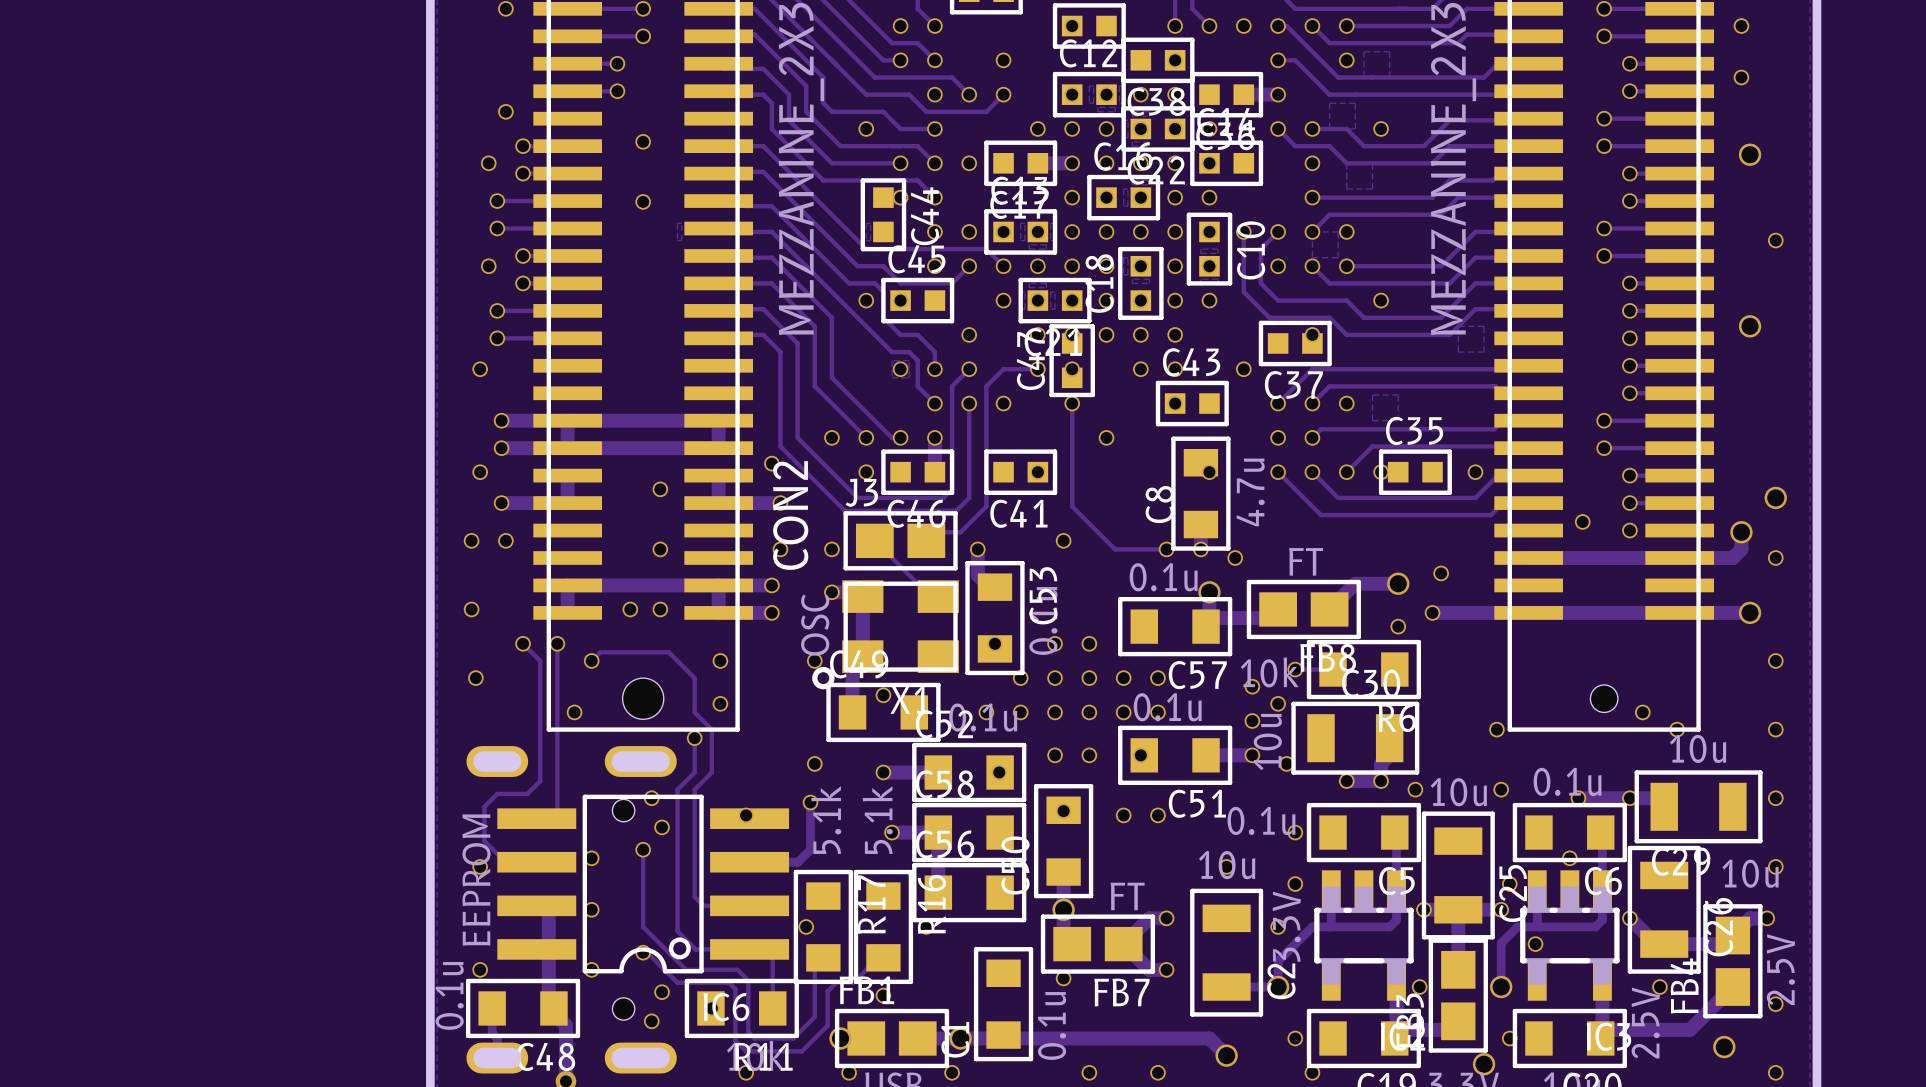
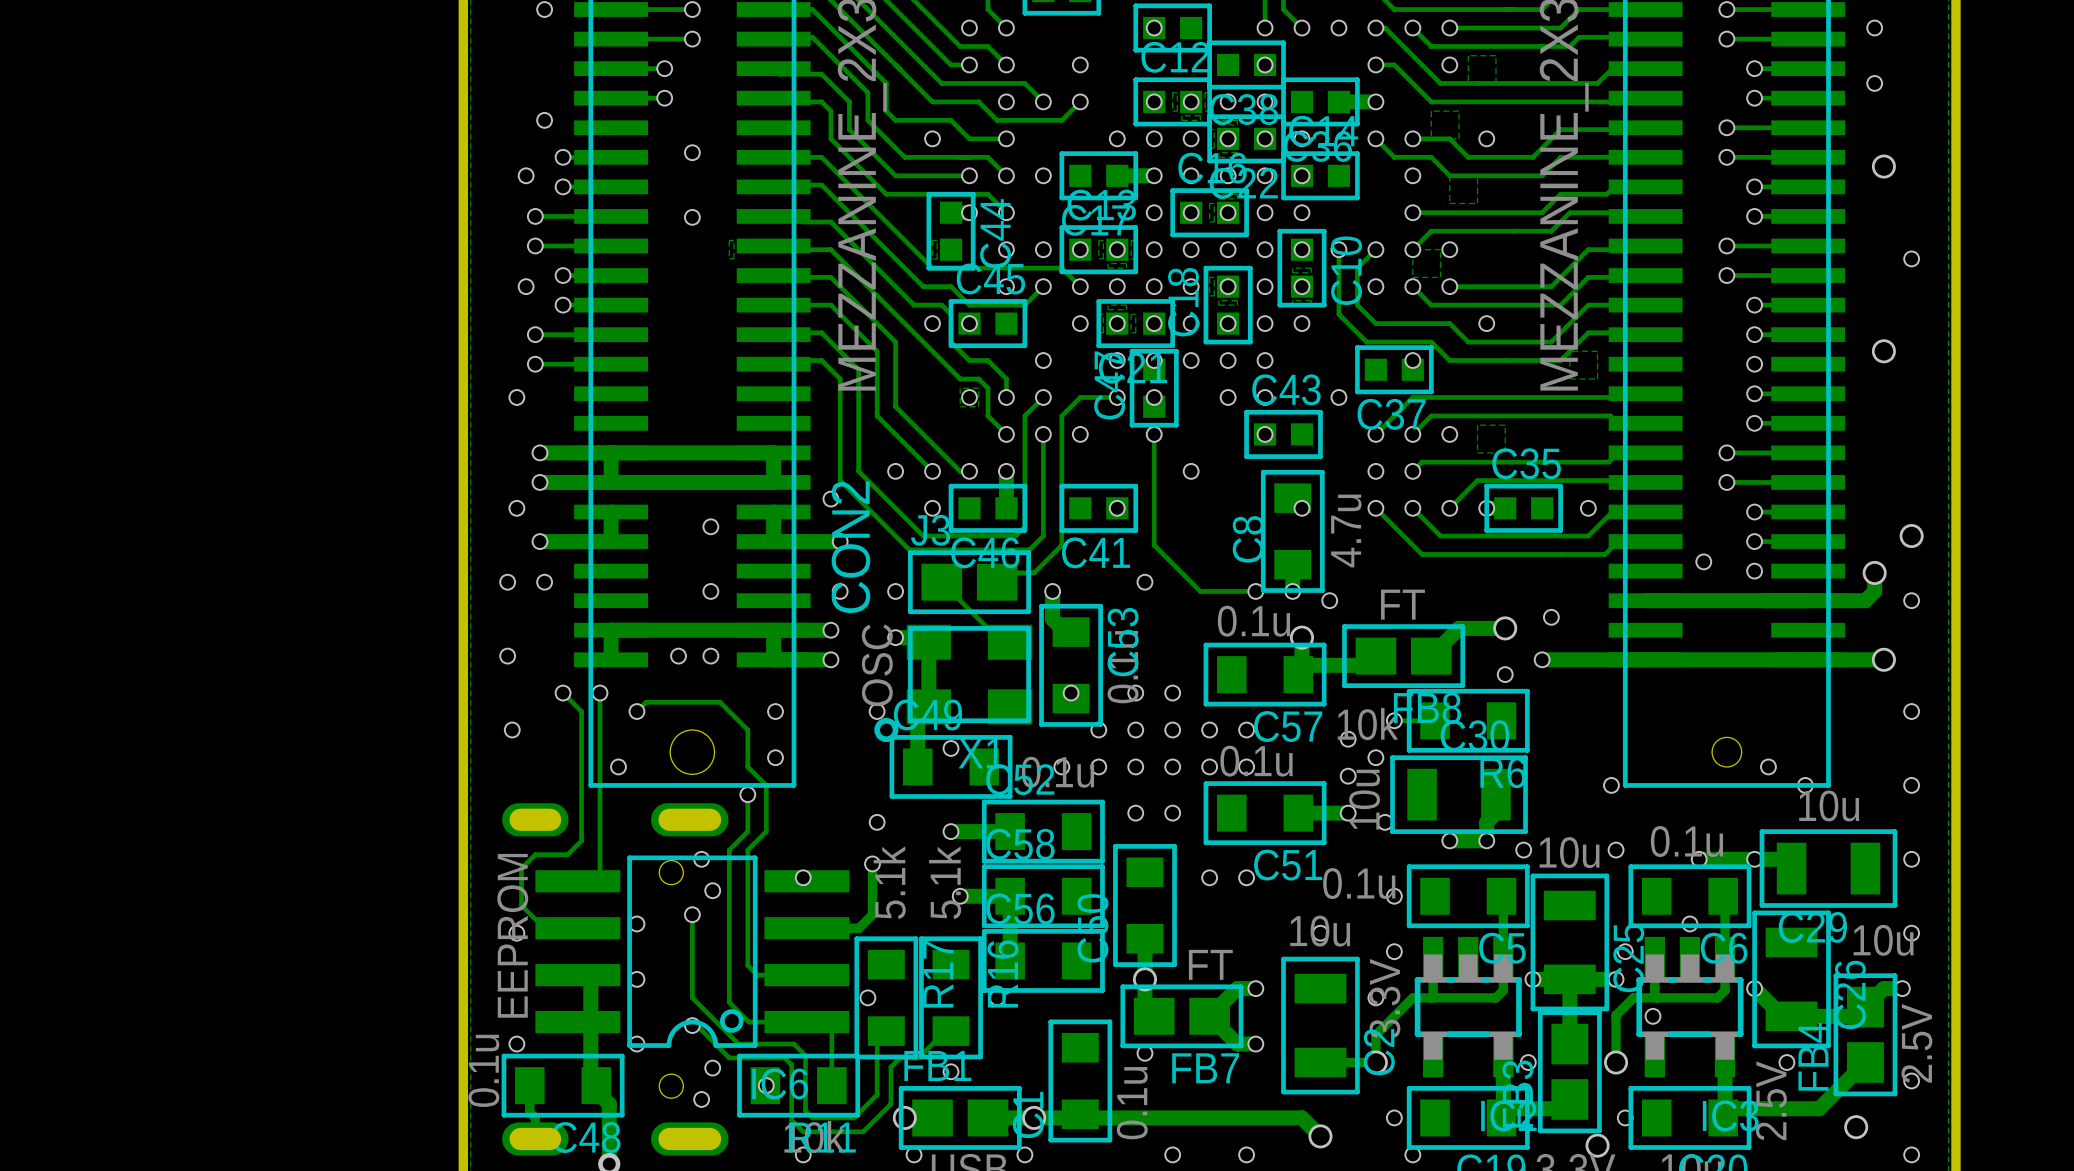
via: (1140, 755) -> none
via: (999, 772) -> none
via: (1063, 811) -> none

